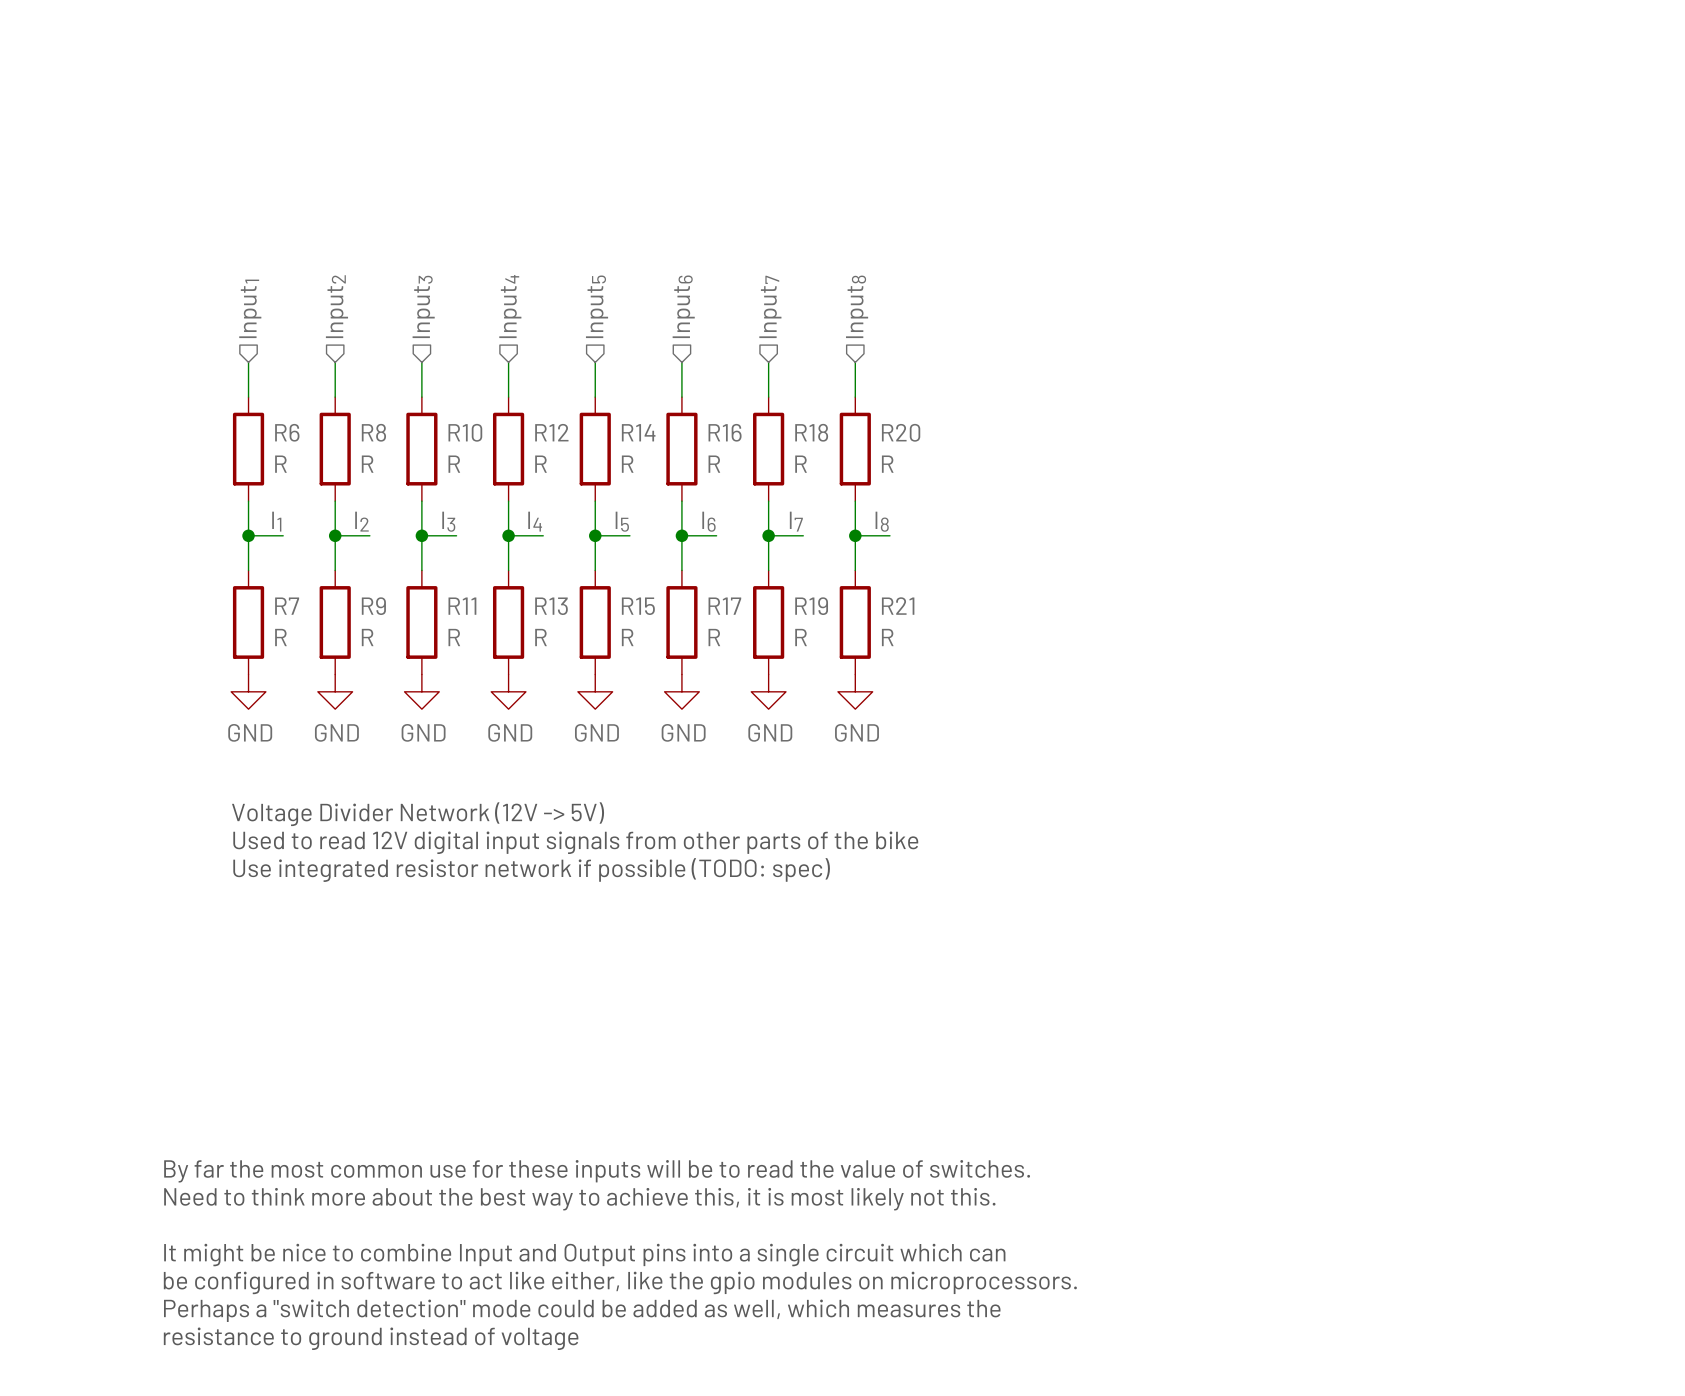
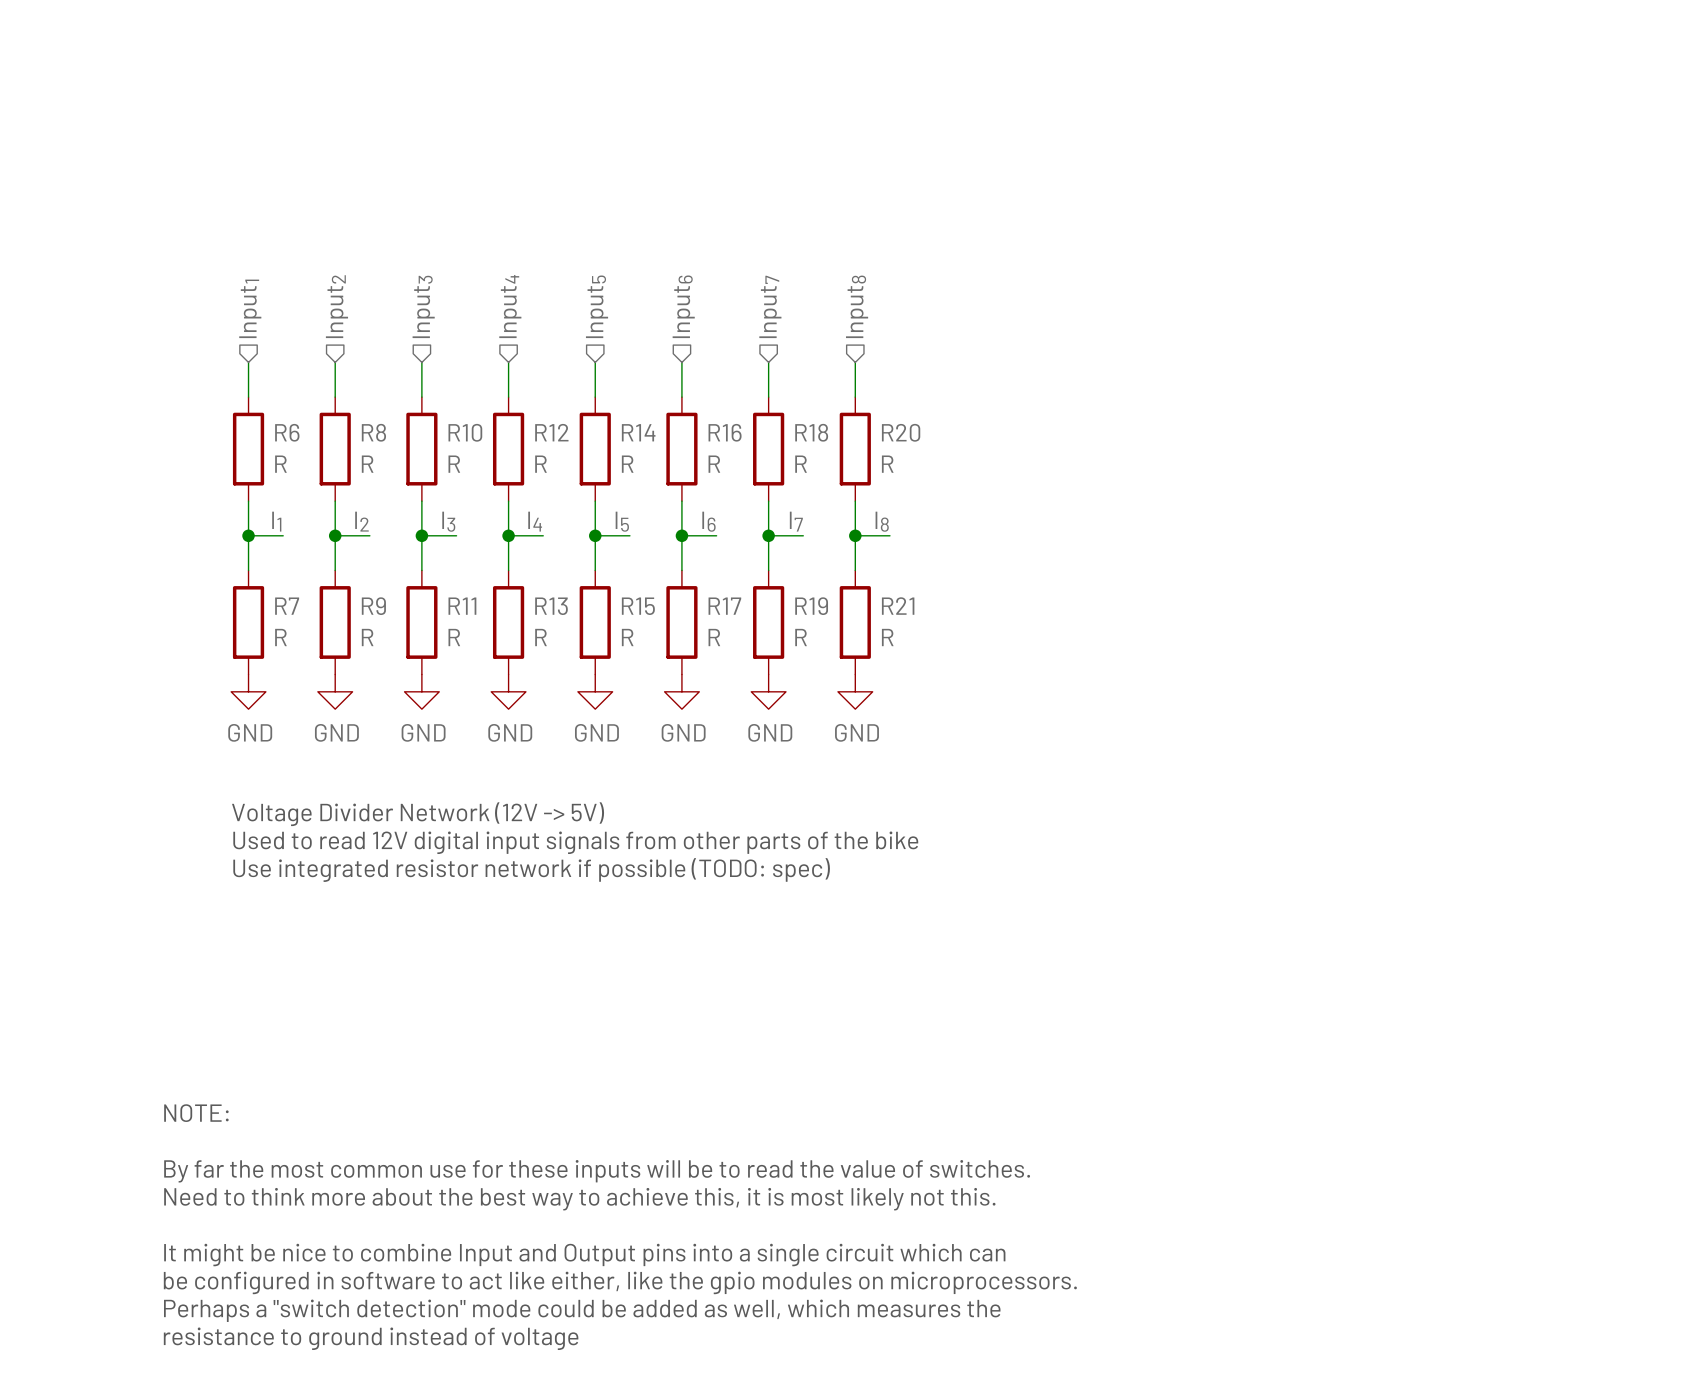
text: none -> NOTE: (196, 1113)

